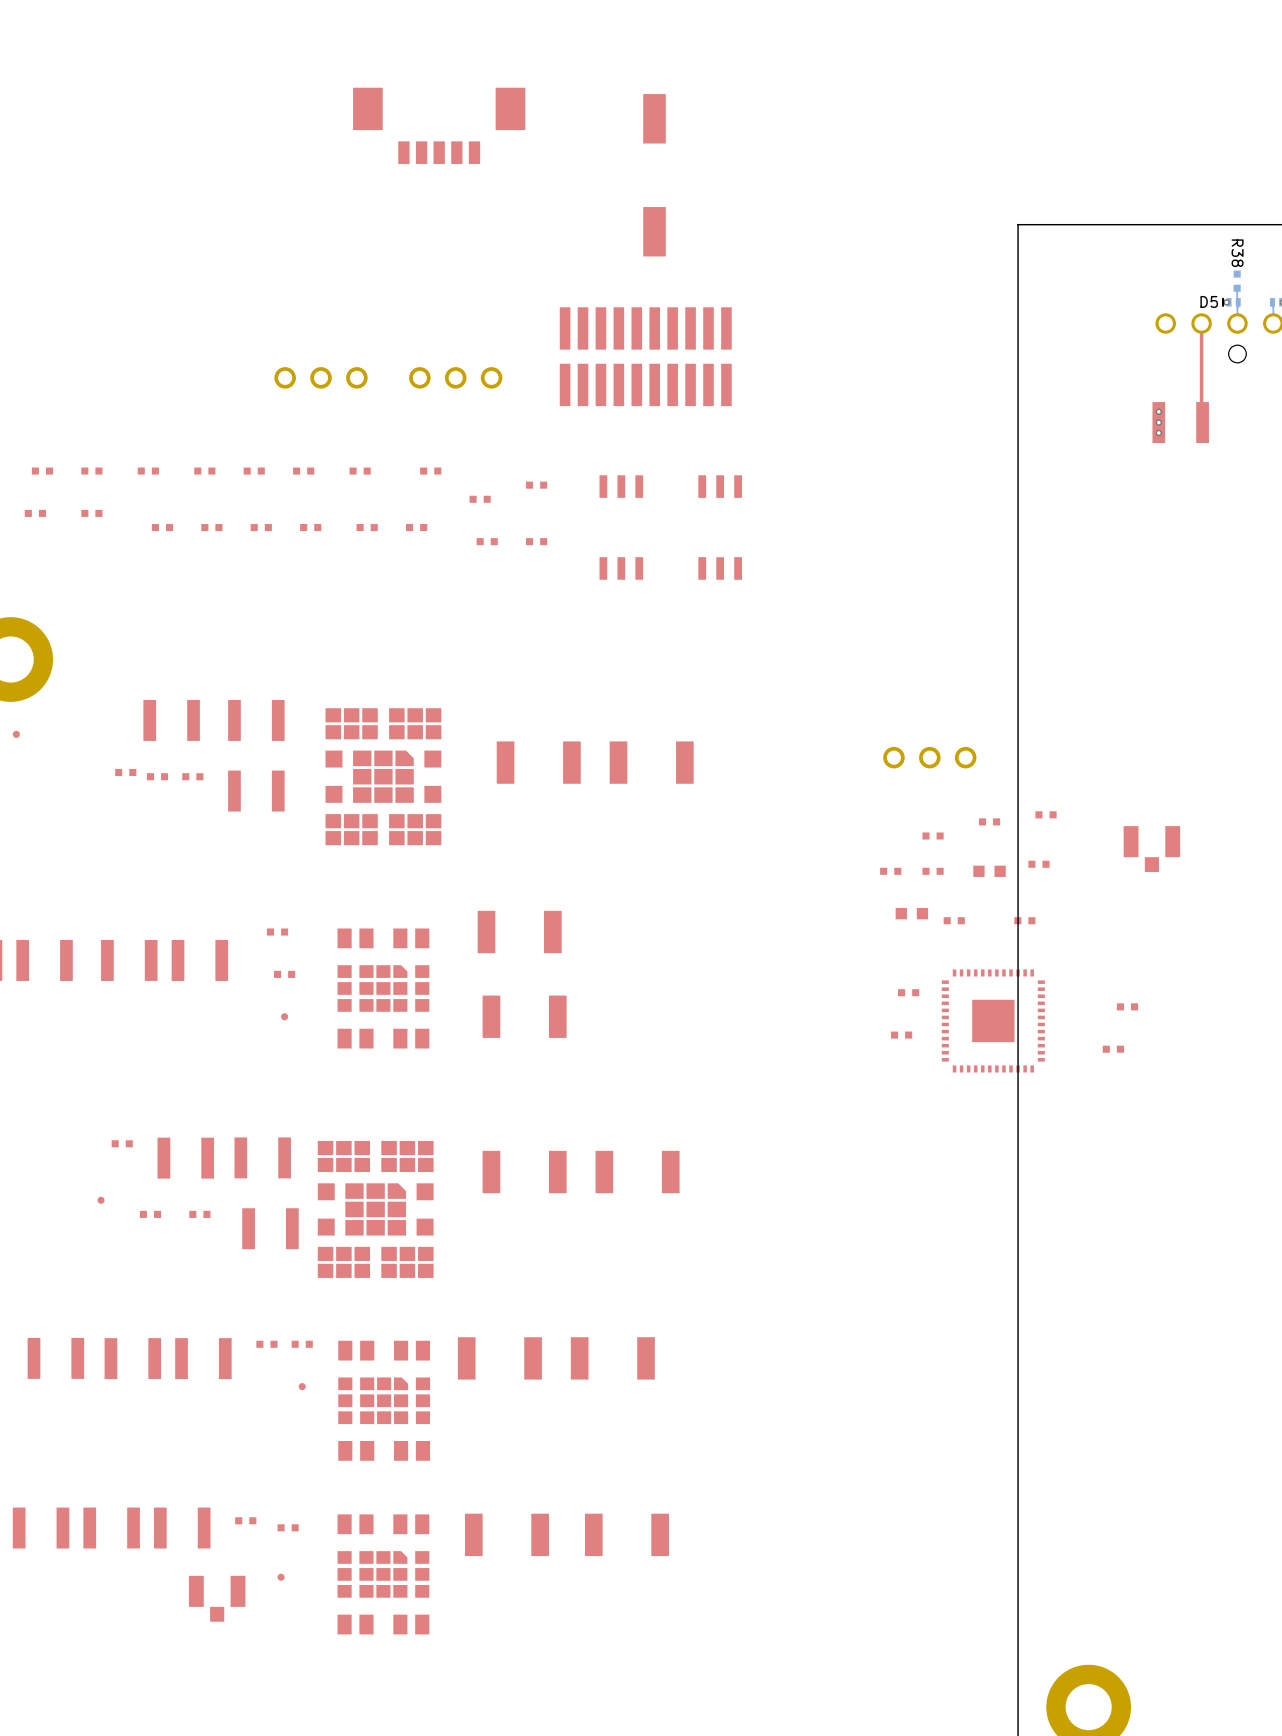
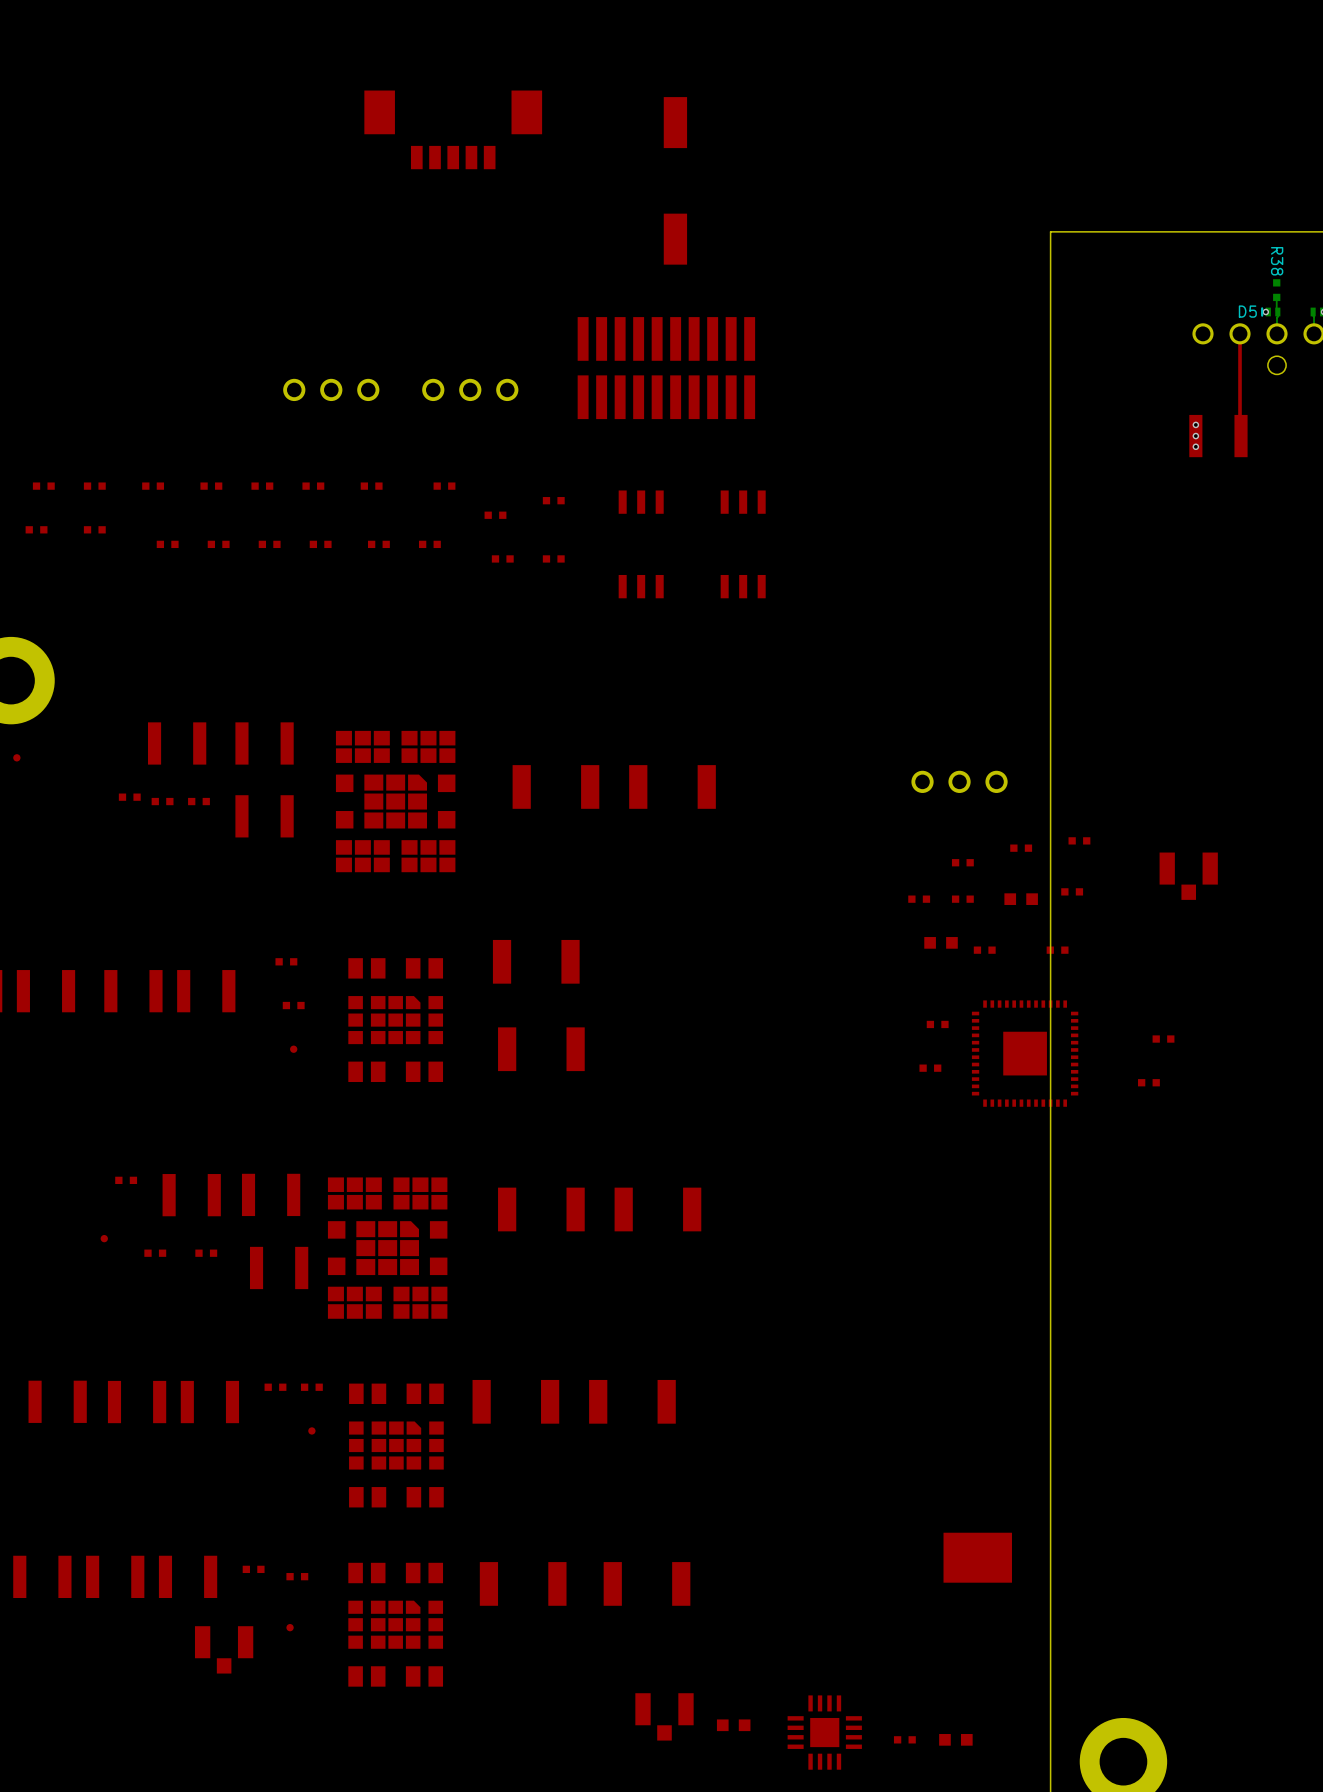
part: none -> (977, 1557)
part: none -> (664, 1716)
part: none -> (733, 1725)
part: none -> (824, 1732)
part: none -> (904, 1739)
part: none -> (955, 1739)

